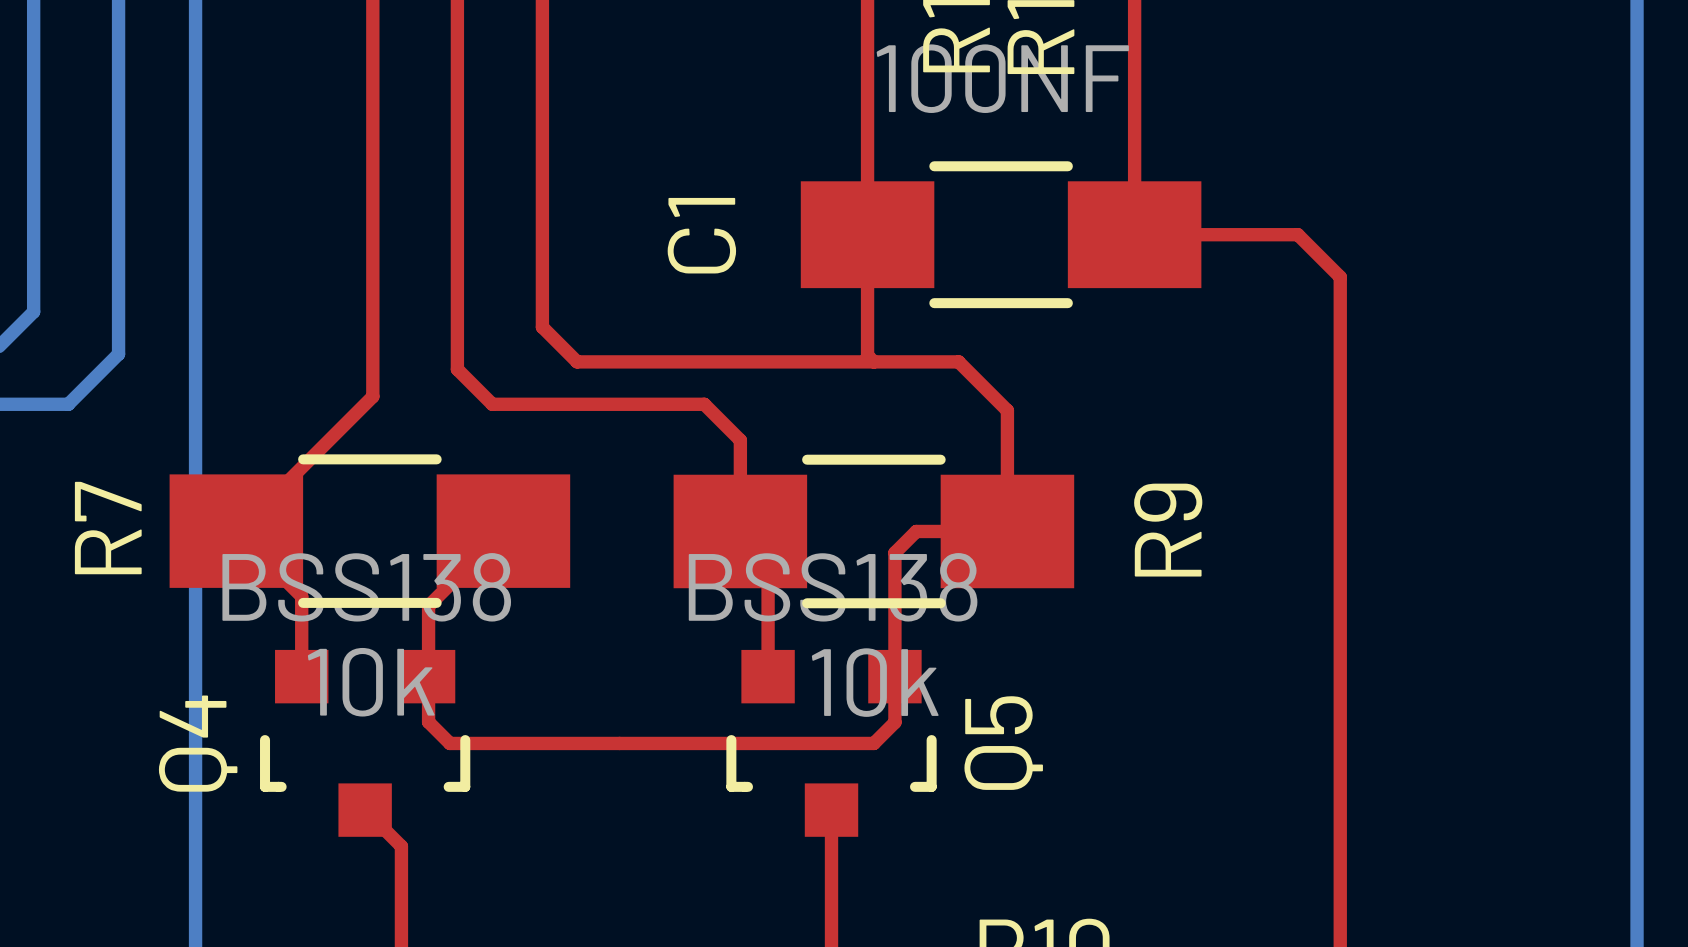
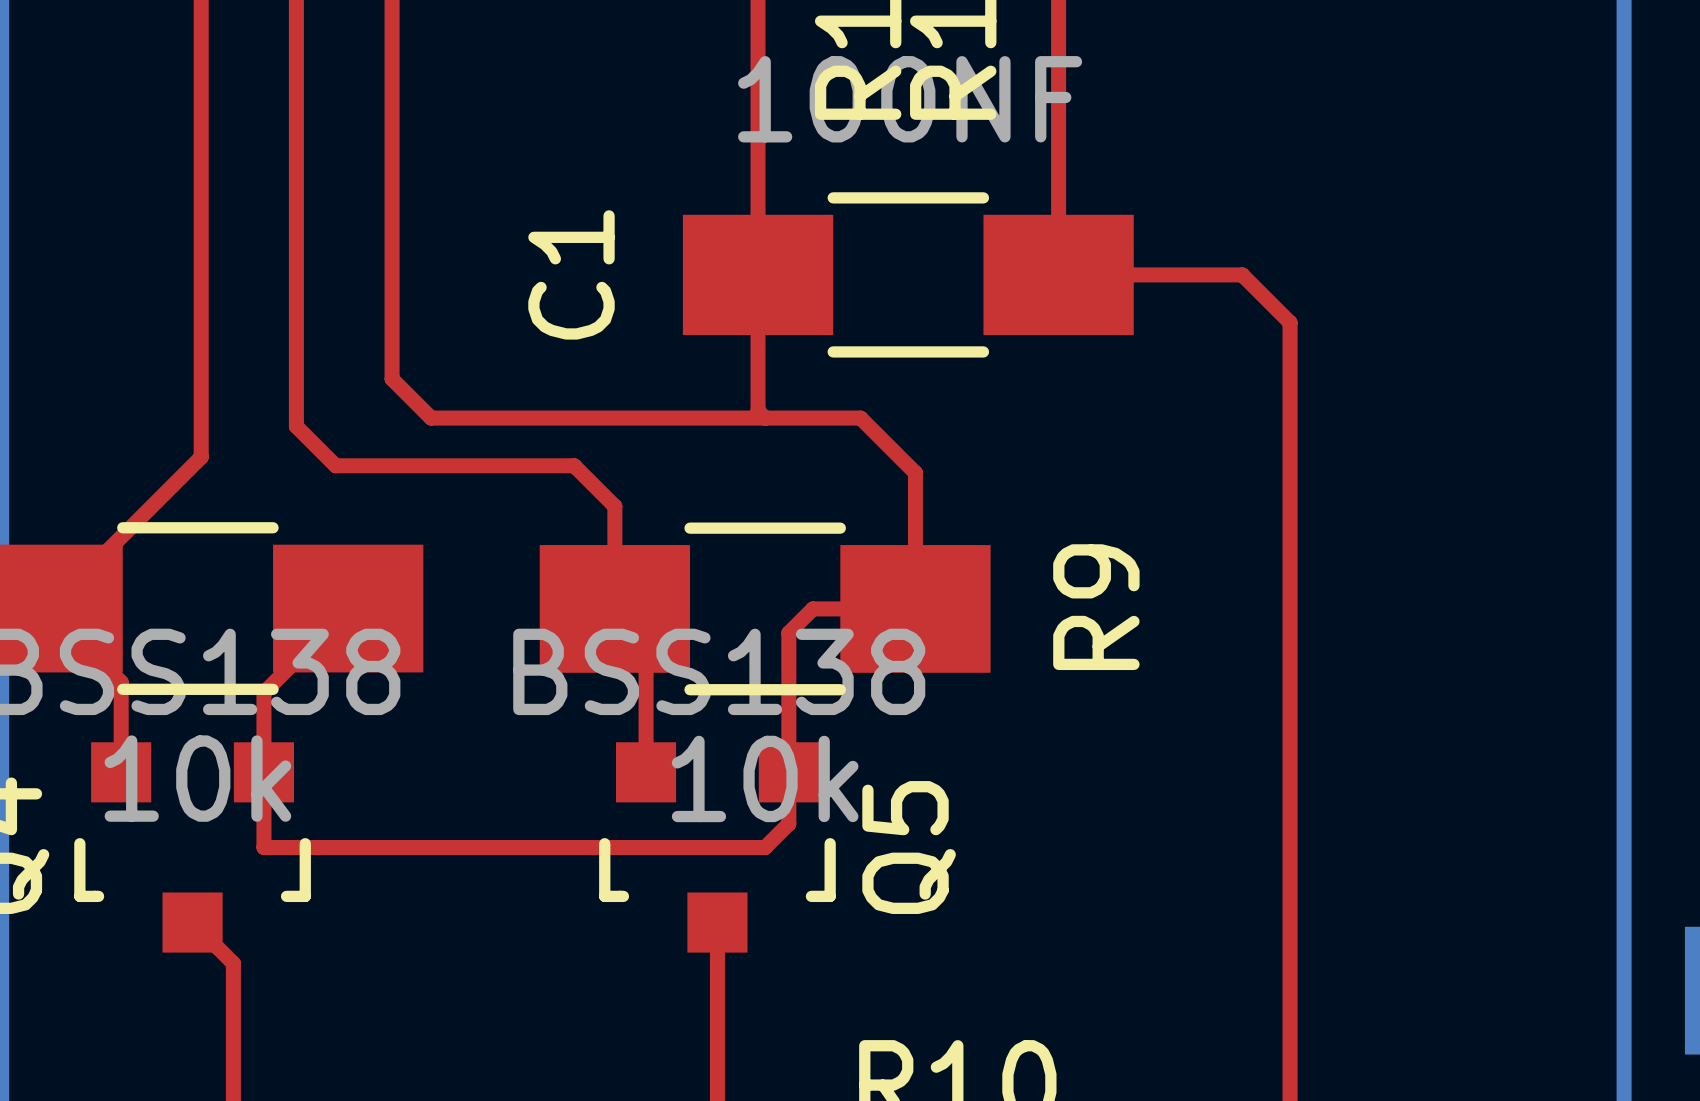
top track: (428, 722) (449, 743) -> (263, 823) (263, 847) (288, 847)

